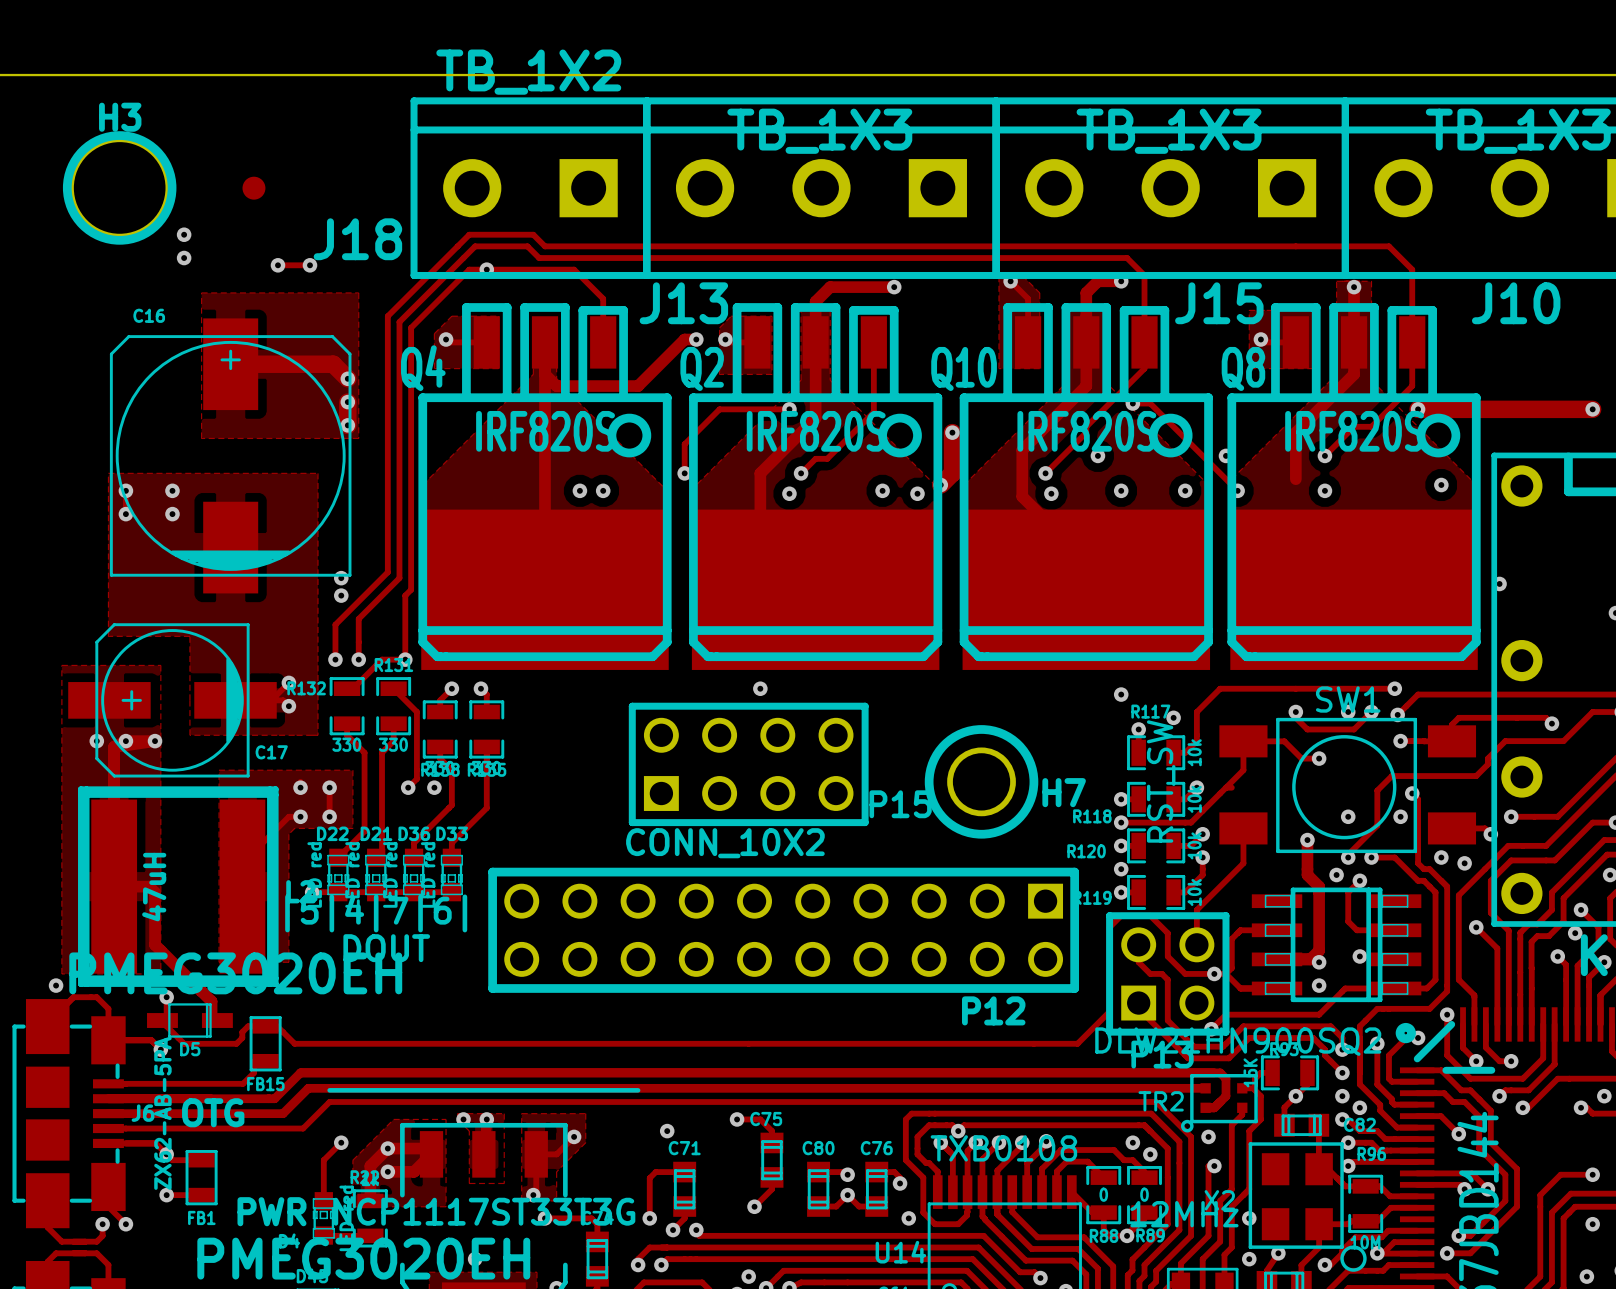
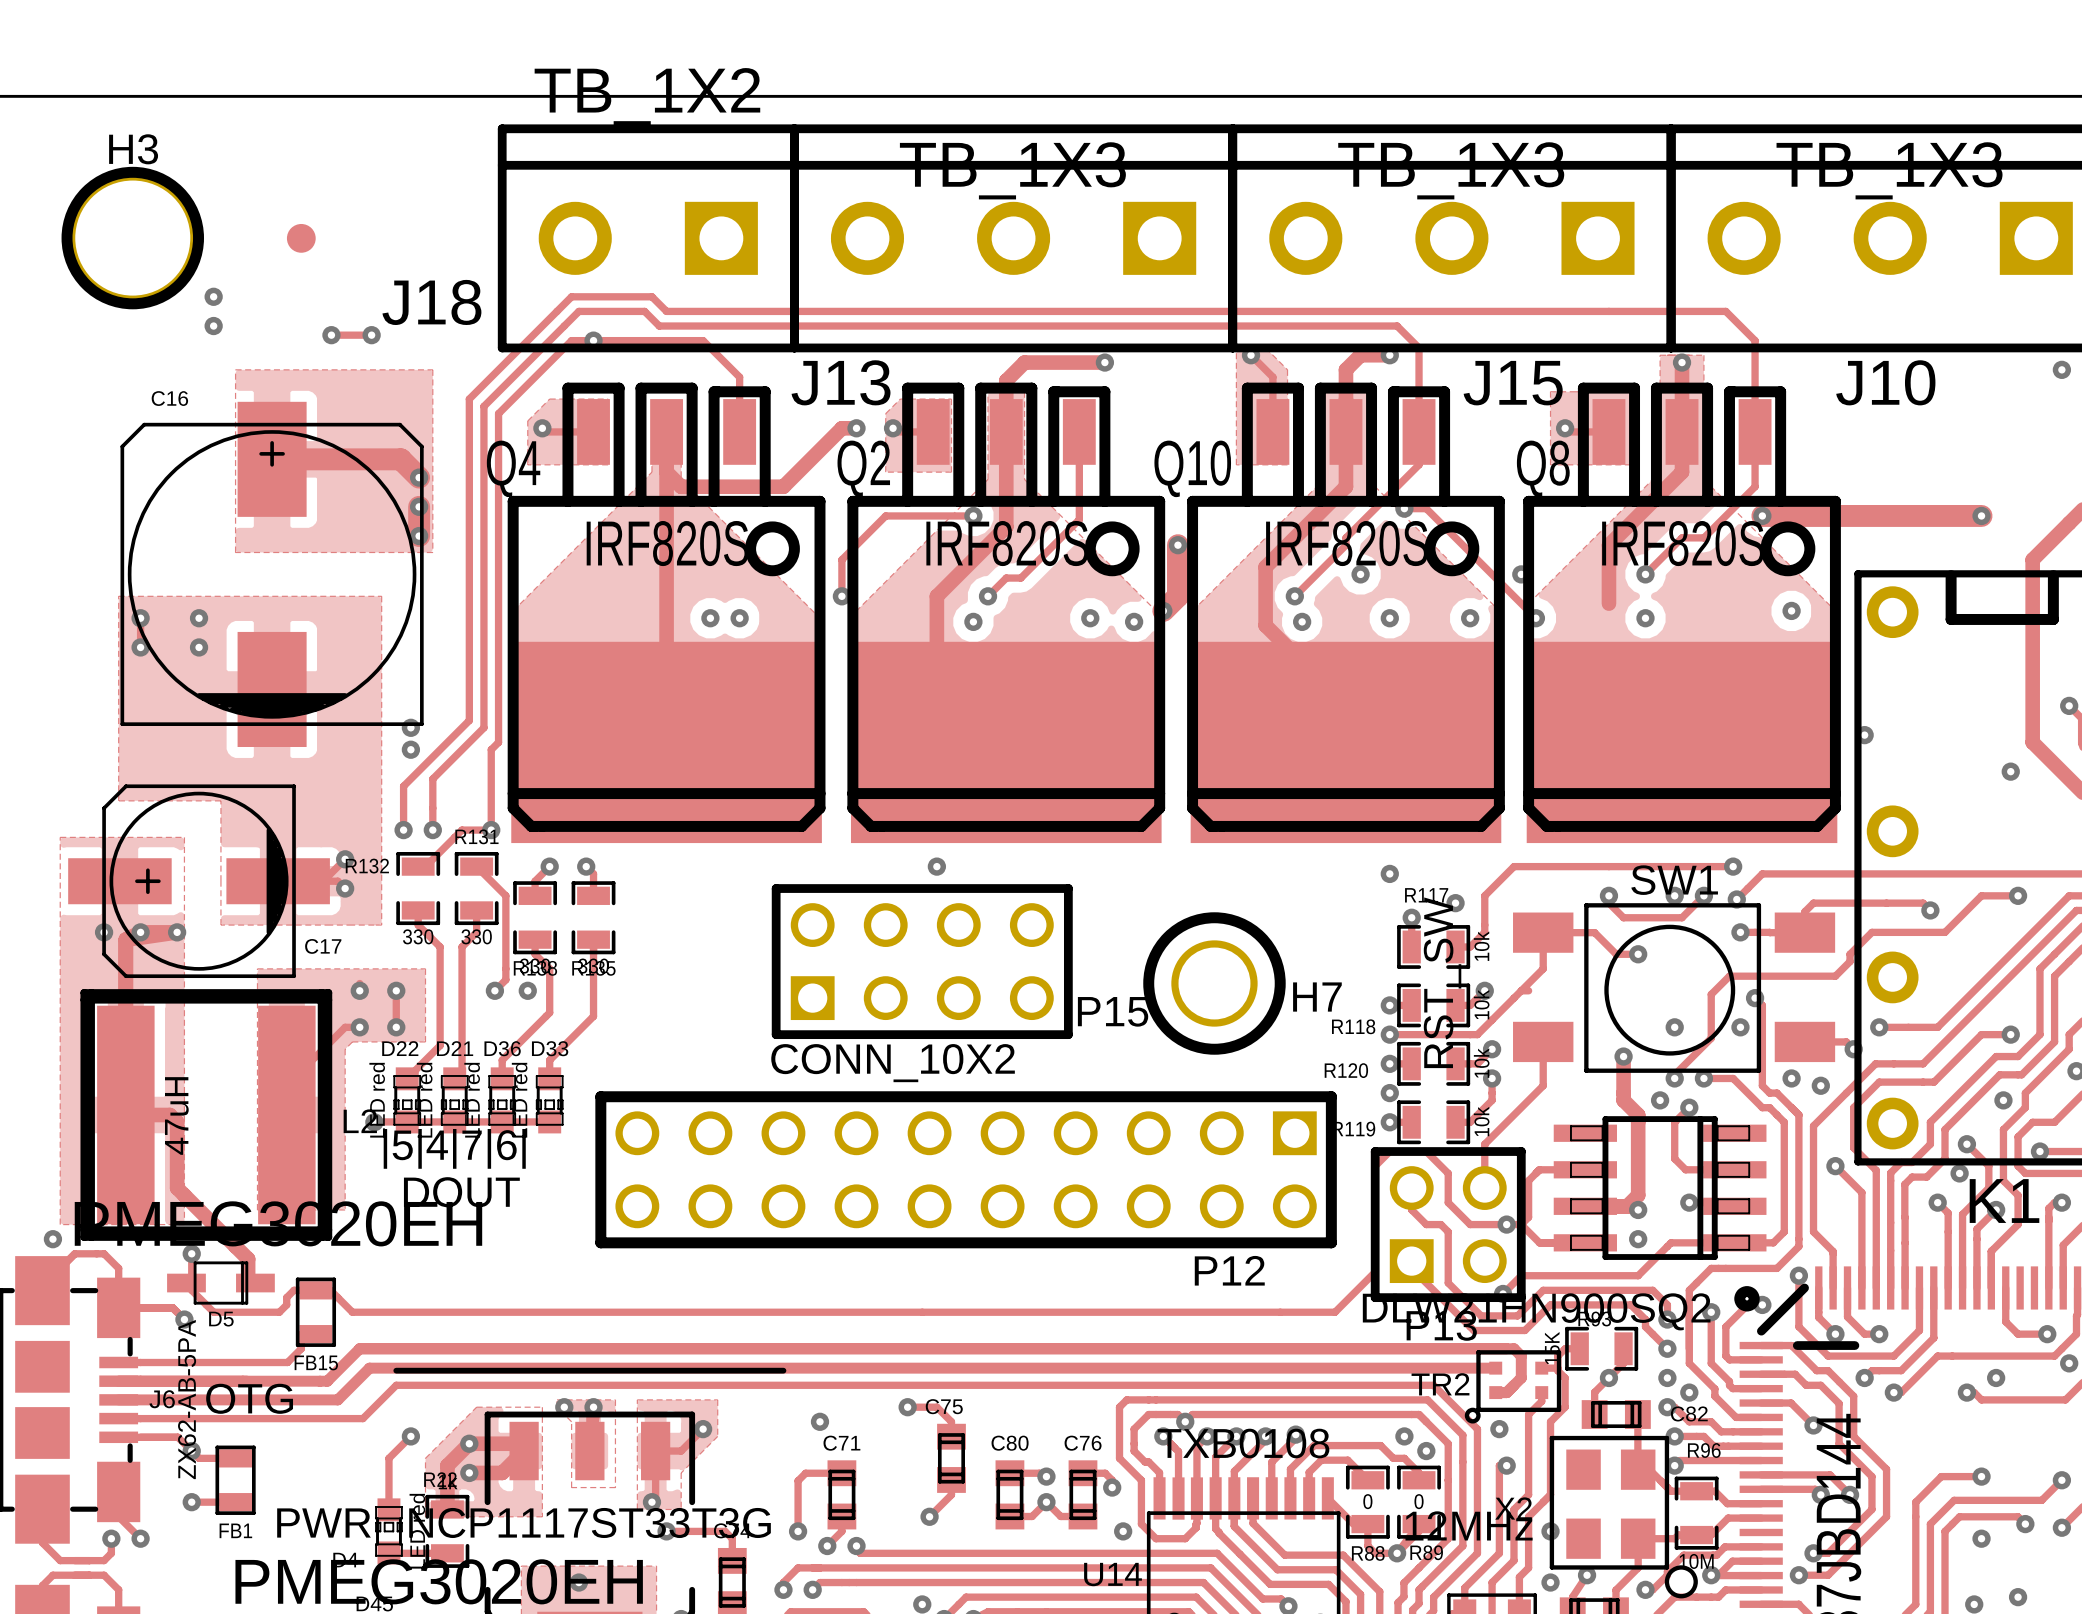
zone outline: (429, 1272) (536, 1272) -> (521, 1598) (521, 1566) (656, 1566) (656, 1598)

